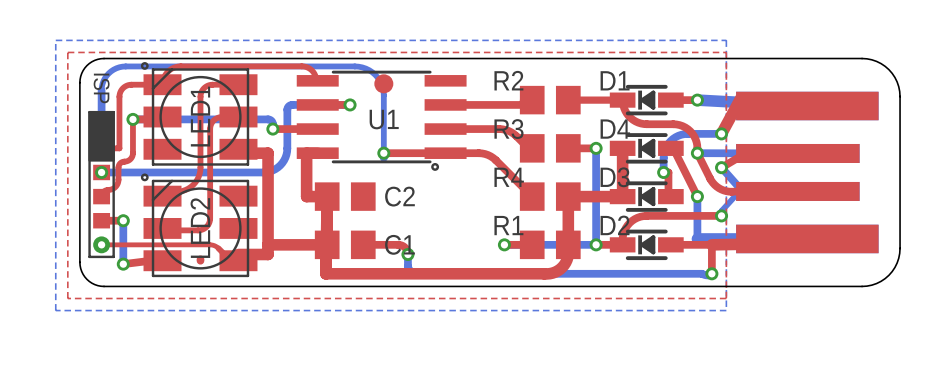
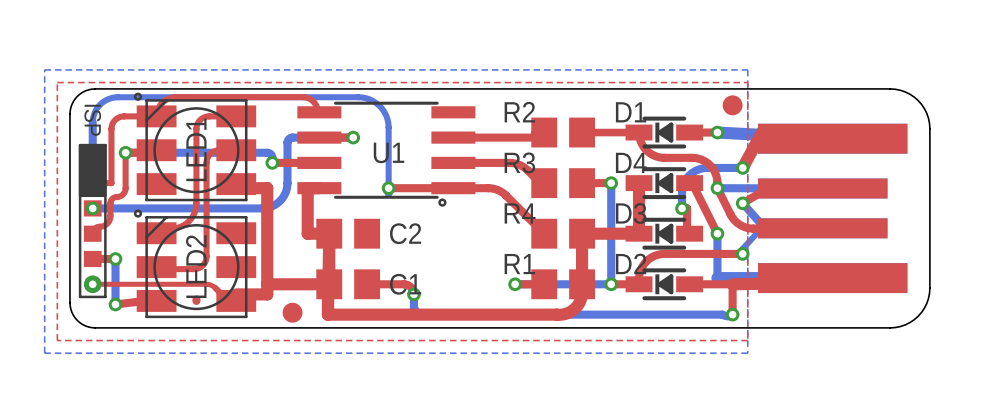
part: none -> (732, 105)
part: (383, 83) -> none
part: none -> (292, 312)

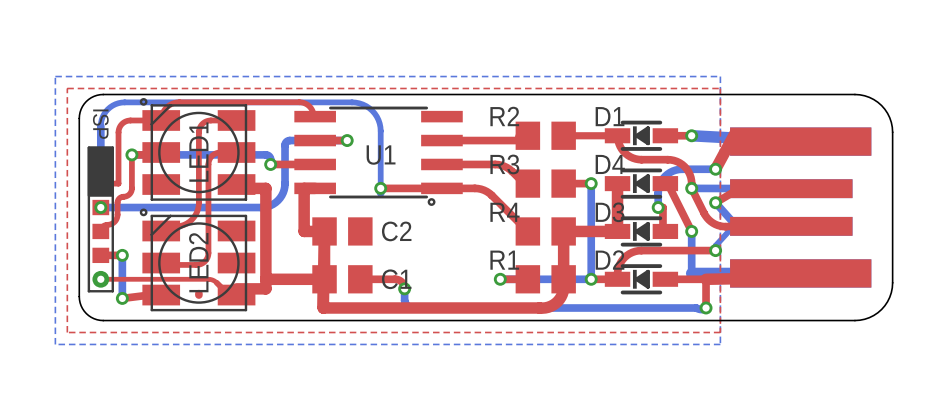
part: (732, 105) -> none
part: (292, 312) -> none

